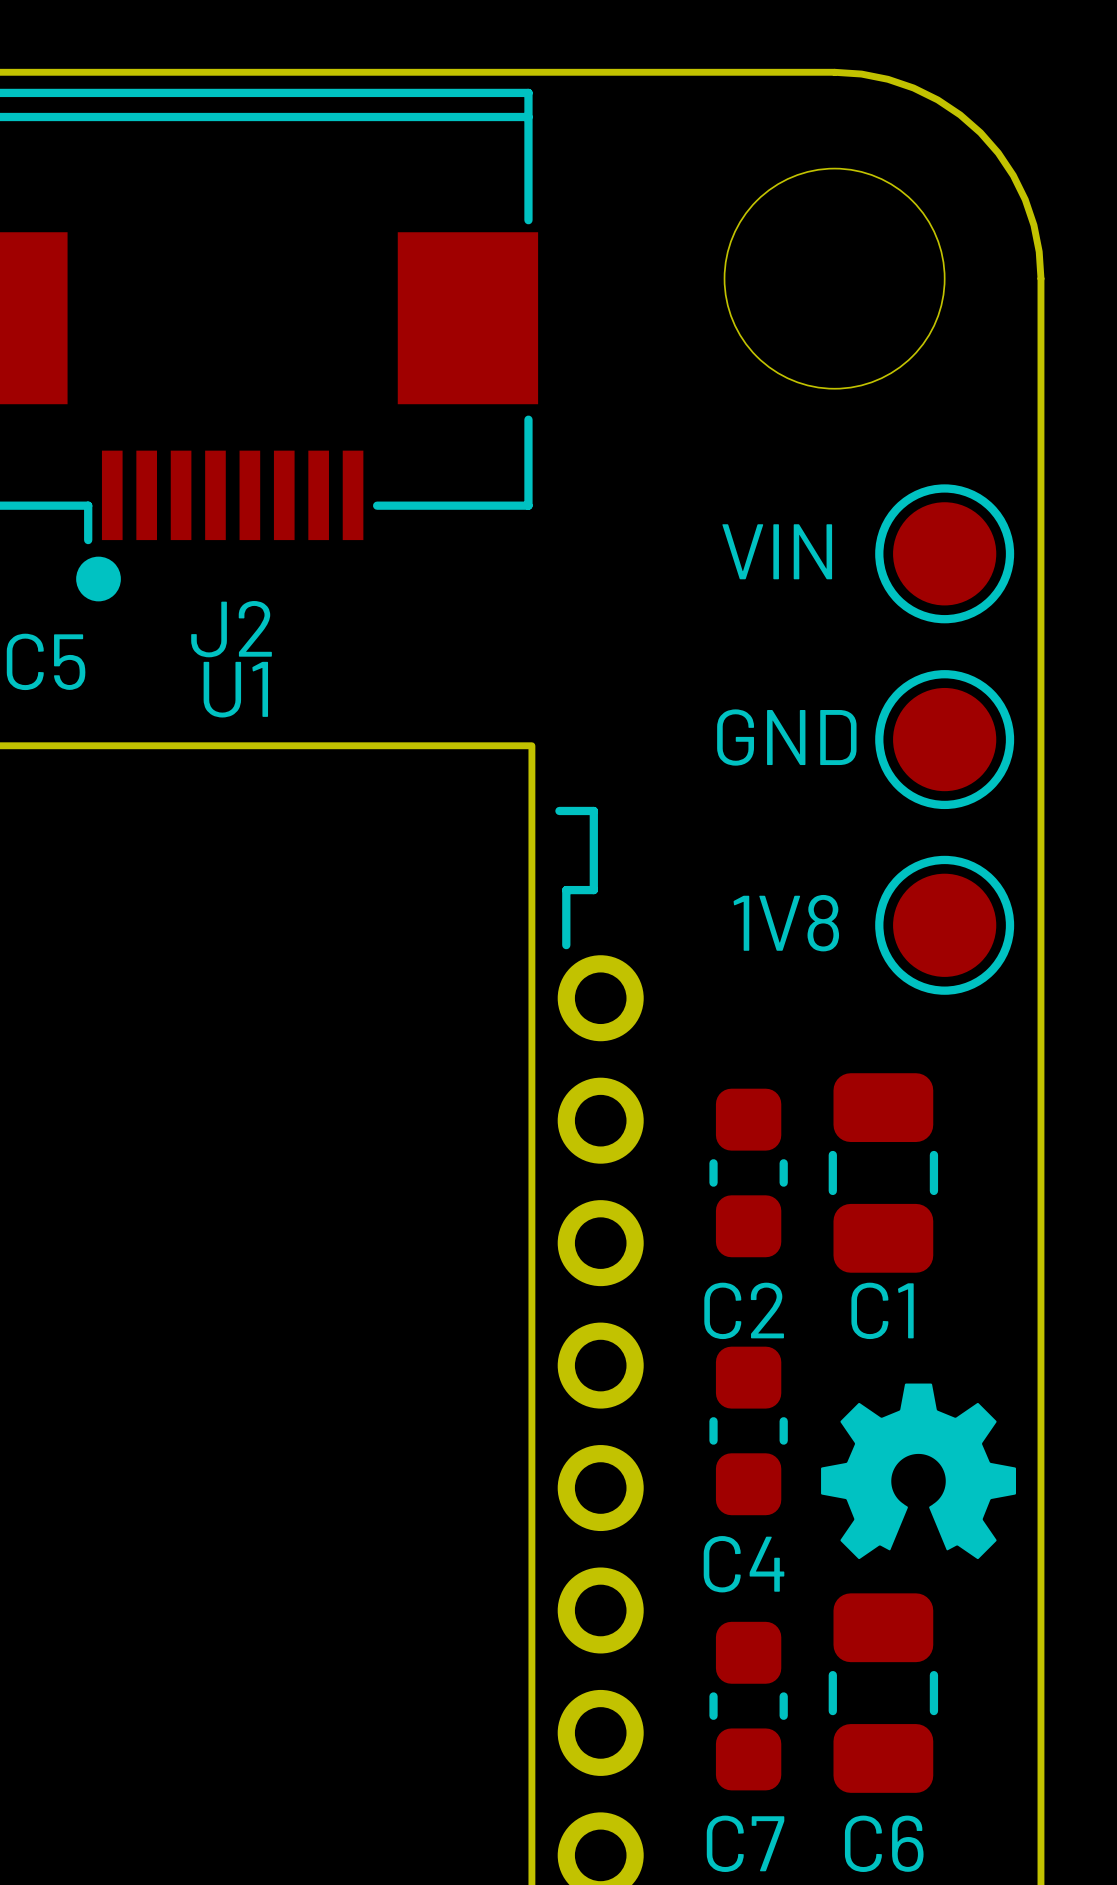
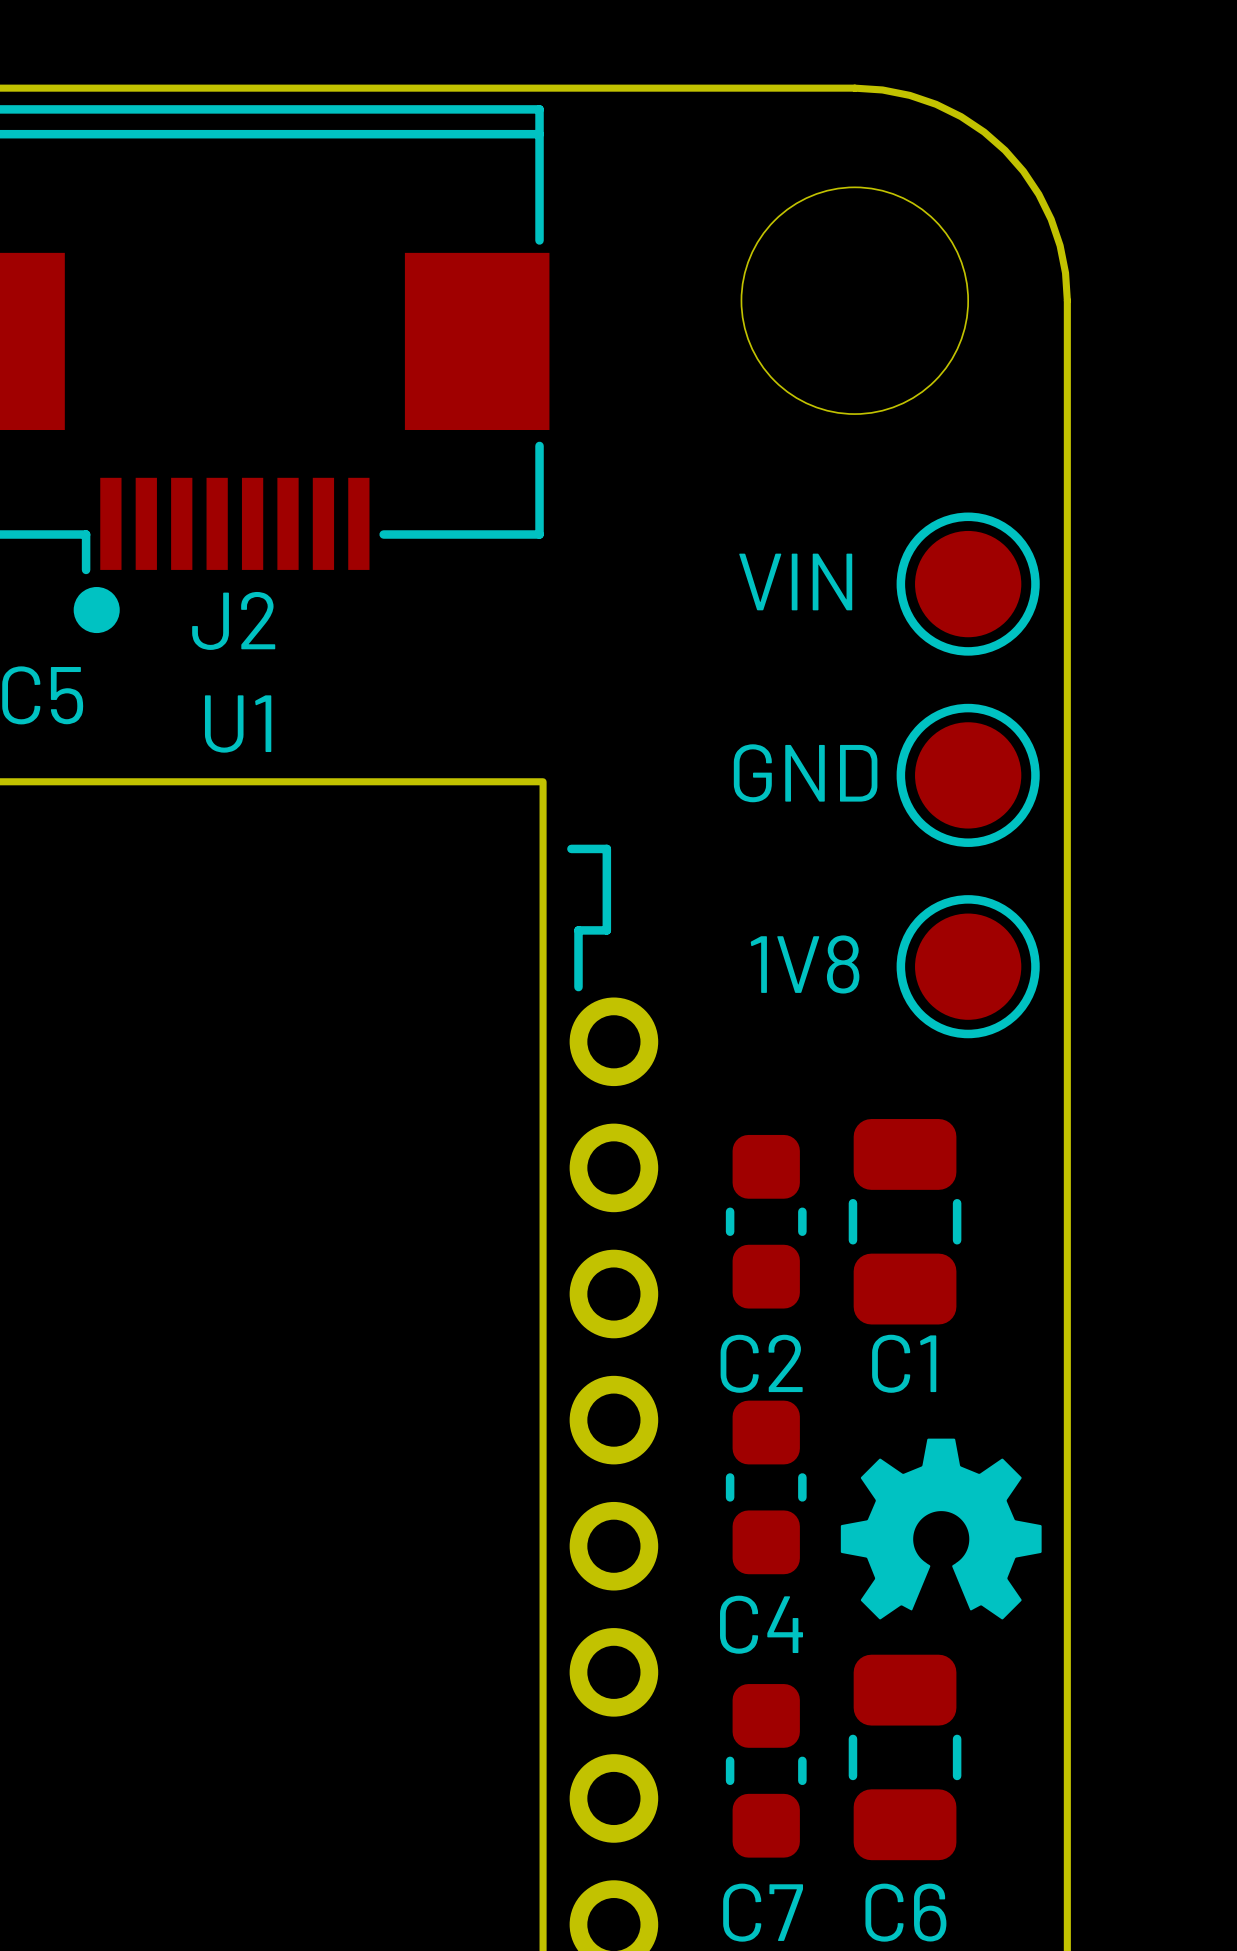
J2 name position: J2 (231, 629) -> J2 (233, 620)

